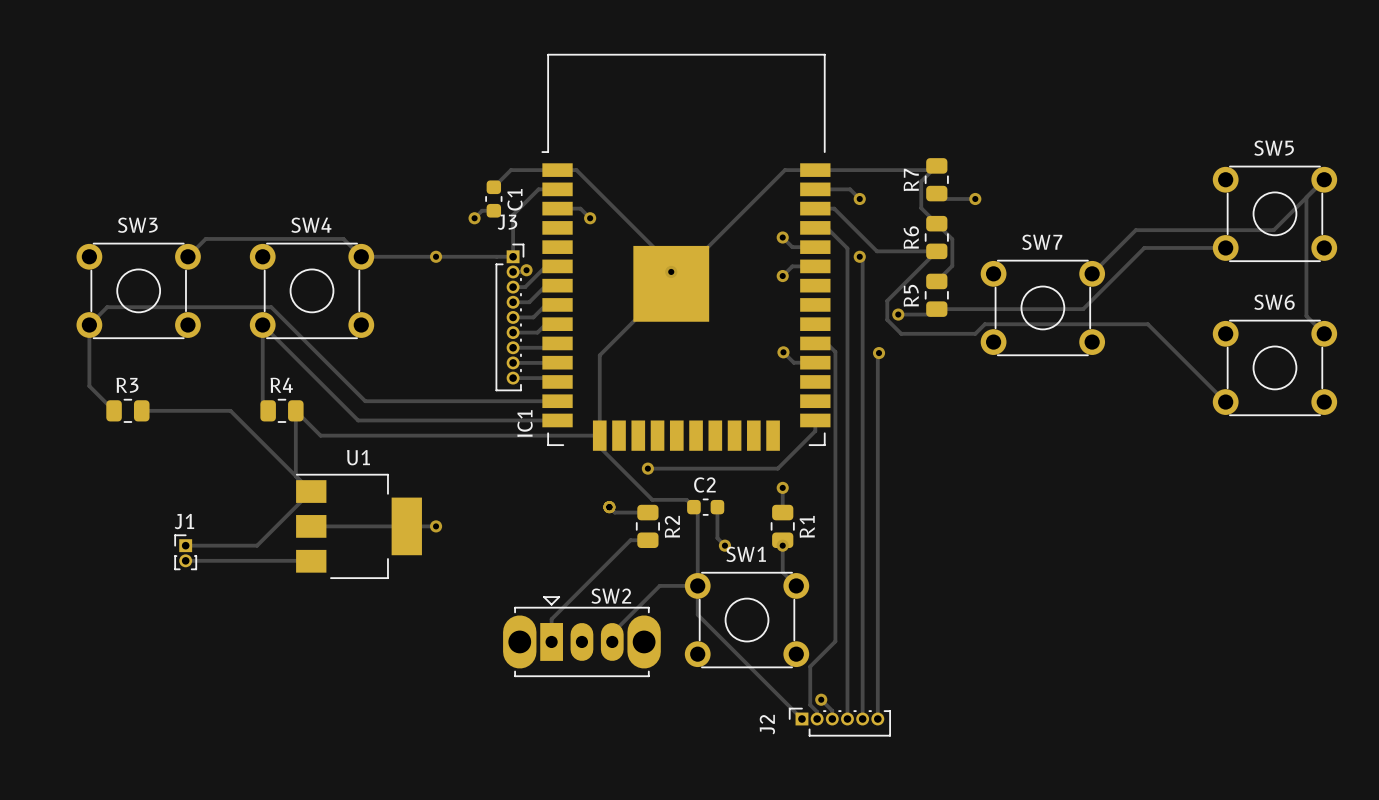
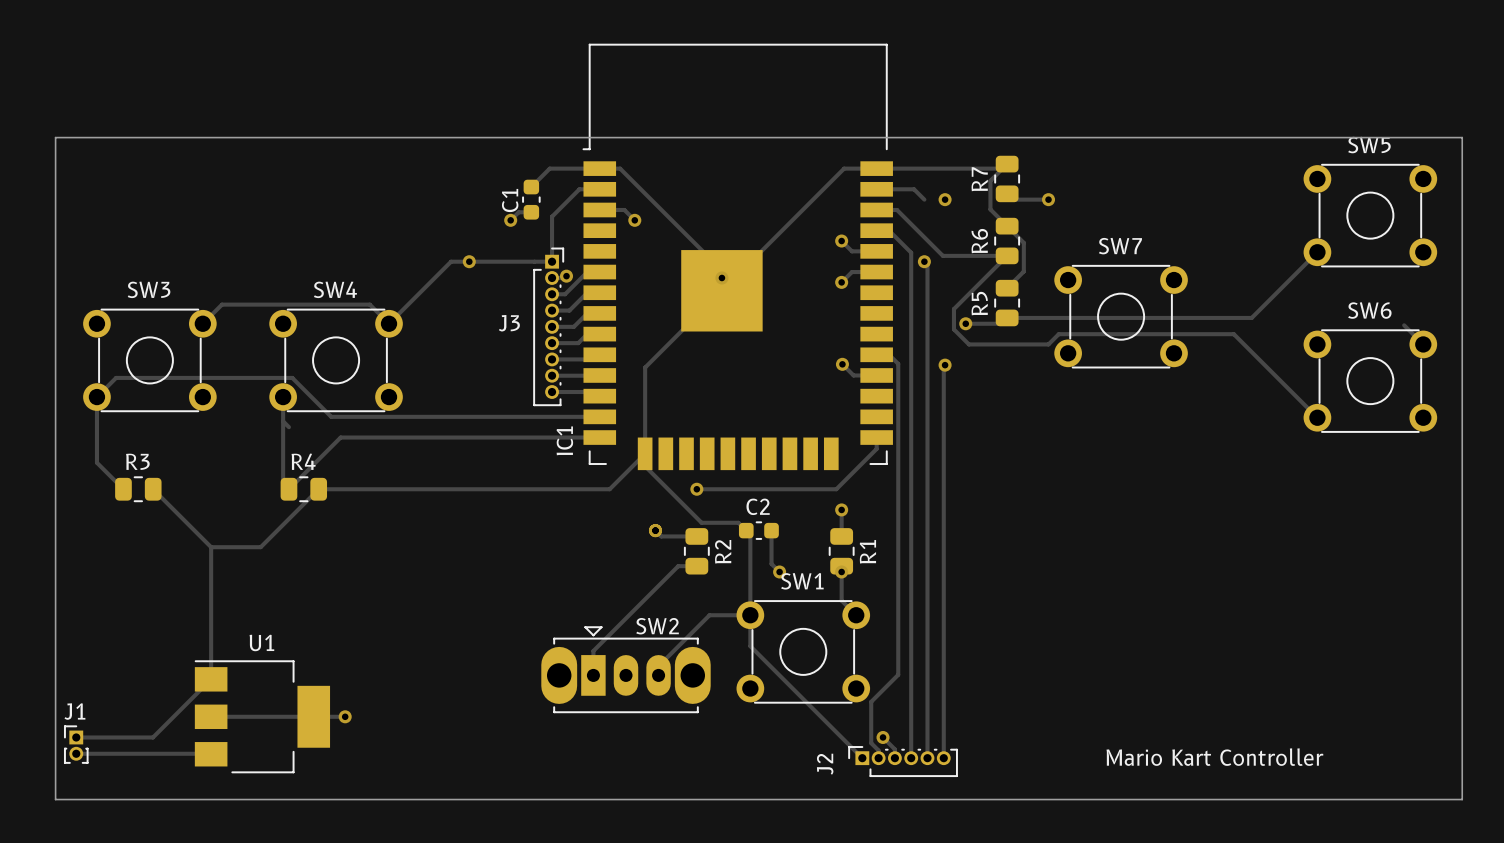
board edge: none -> (55, 137) (55, 799) (1462, 799) (1462, 137) (55, 137)
track: (1324, 179) (1273, 230) (1135, 230) (1092, 273) -> none
track: (1306, 197) (1306, 315) -> none
via position: (859, 198) -> (945, 199)
C1 name position: C1 (515, 199) -> C1 (510, 200)
J3 name position: J3 (507, 222) -> J3 (509, 323)
track: (1225, 247) (1144, 247) (1083, 309) -> (1317, 252) (1251, 317) (1164, 317)
track: (187, 256) (205, 238) (343, 238) (361, 256) (419, 256) -> (202, 323) (221, 304) (369, 304) (389, 323) (451, 261)
SW3 position: (138, 290) -> (149, 360)
SW4 position: (312, 290) -> (336, 360)
track: (89, 382) (89, 325) (107, 307) (271, 307) (365, 401) -> (96, 397) (116, 377) (292, 377) (331, 416) (393, 416)
track: (262, 382) (262, 325) (358, 420) -> (283, 421) (283, 483) (288, 489) (340, 437) (385, 437)
track: (89, 386) (114, 410) -> (96, 400) (96, 462) (123, 489)
R3 position: (127, 410) -> (138, 489)
track: (141, 410) (230, 410) (311, 491) (257, 545) (185, 545) -> none
R4 position: (281, 410) -> (303, 489)
track: (599, 435) (320, 435) (295, 410) (295, 476) -> (645, 453) (609, 489) (318, 489) (260, 547) (211, 547)
track: none -> (153, 489) (211, 547)
track: none -> (211, 547) (211, 679) (152, 737) (76, 737)
track: (311, 526) (436, 526) -> (211, 716) (345, 716)
U1 position: (358, 526) -> (262, 716)
via: (436, 526) -> none
J1 position: (185, 552) -> (76, 744)
track: (185, 560) (311, 561) -> (76, 753) (211, 754)
via: none -> (345, 716)
text: none -> Mario Kart Controller (1214, 757)

